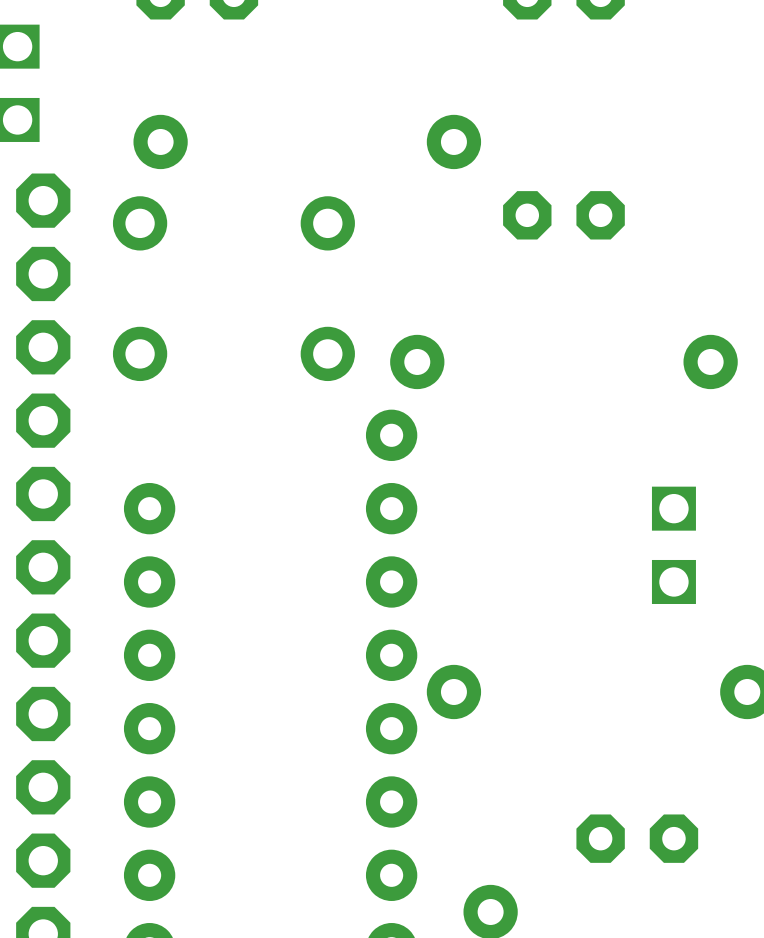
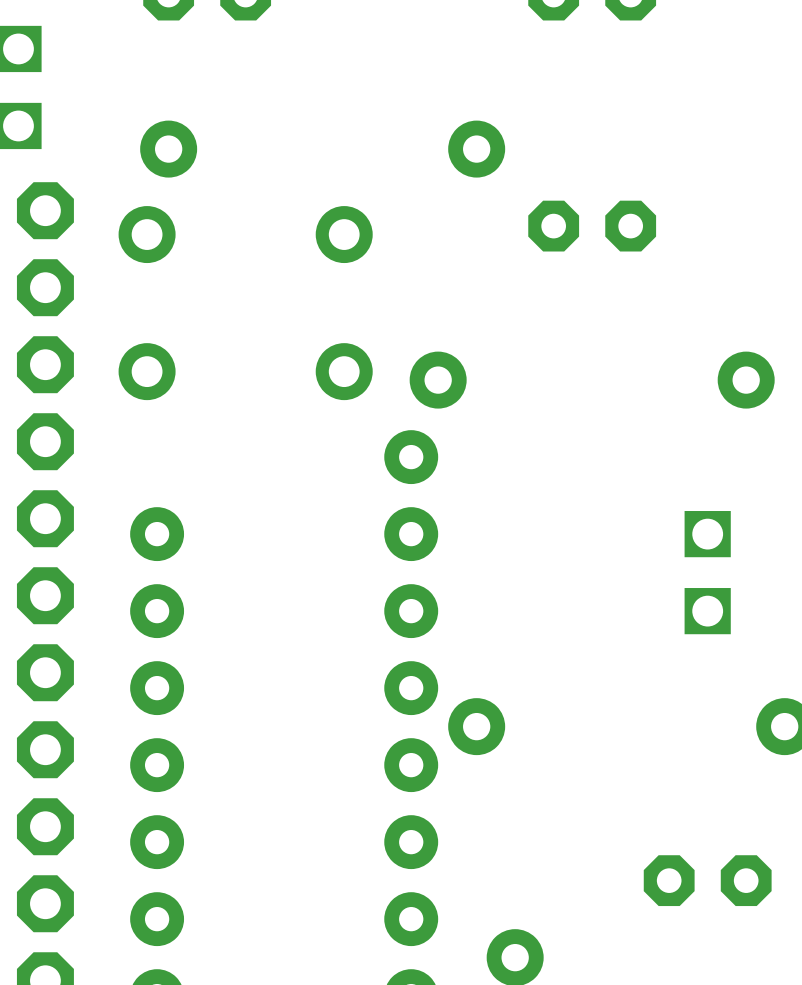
part position: (637, 838) -> (707, 880)

